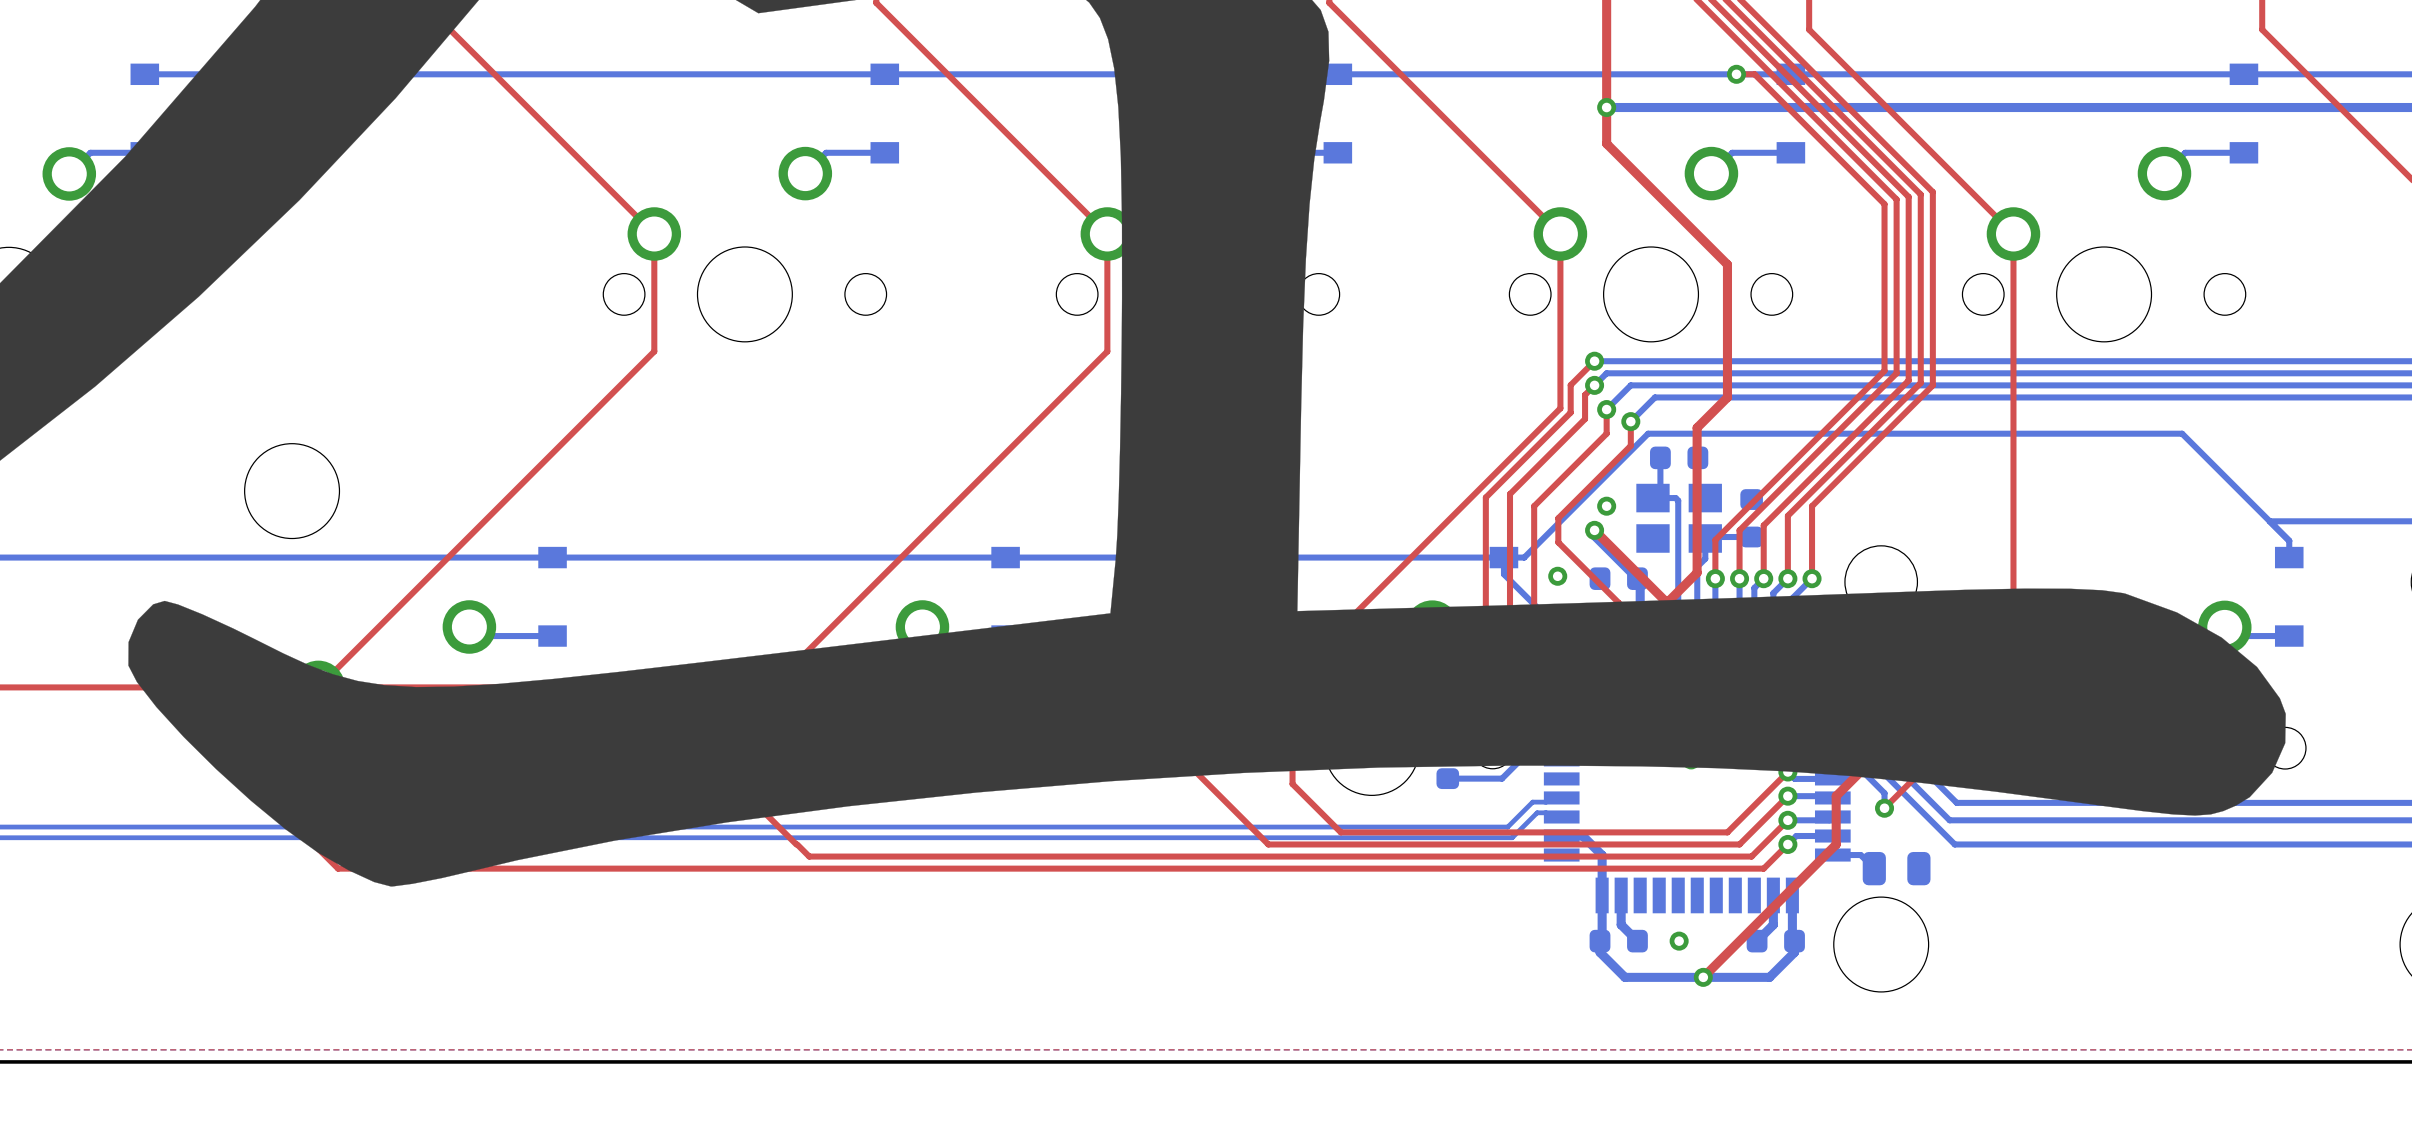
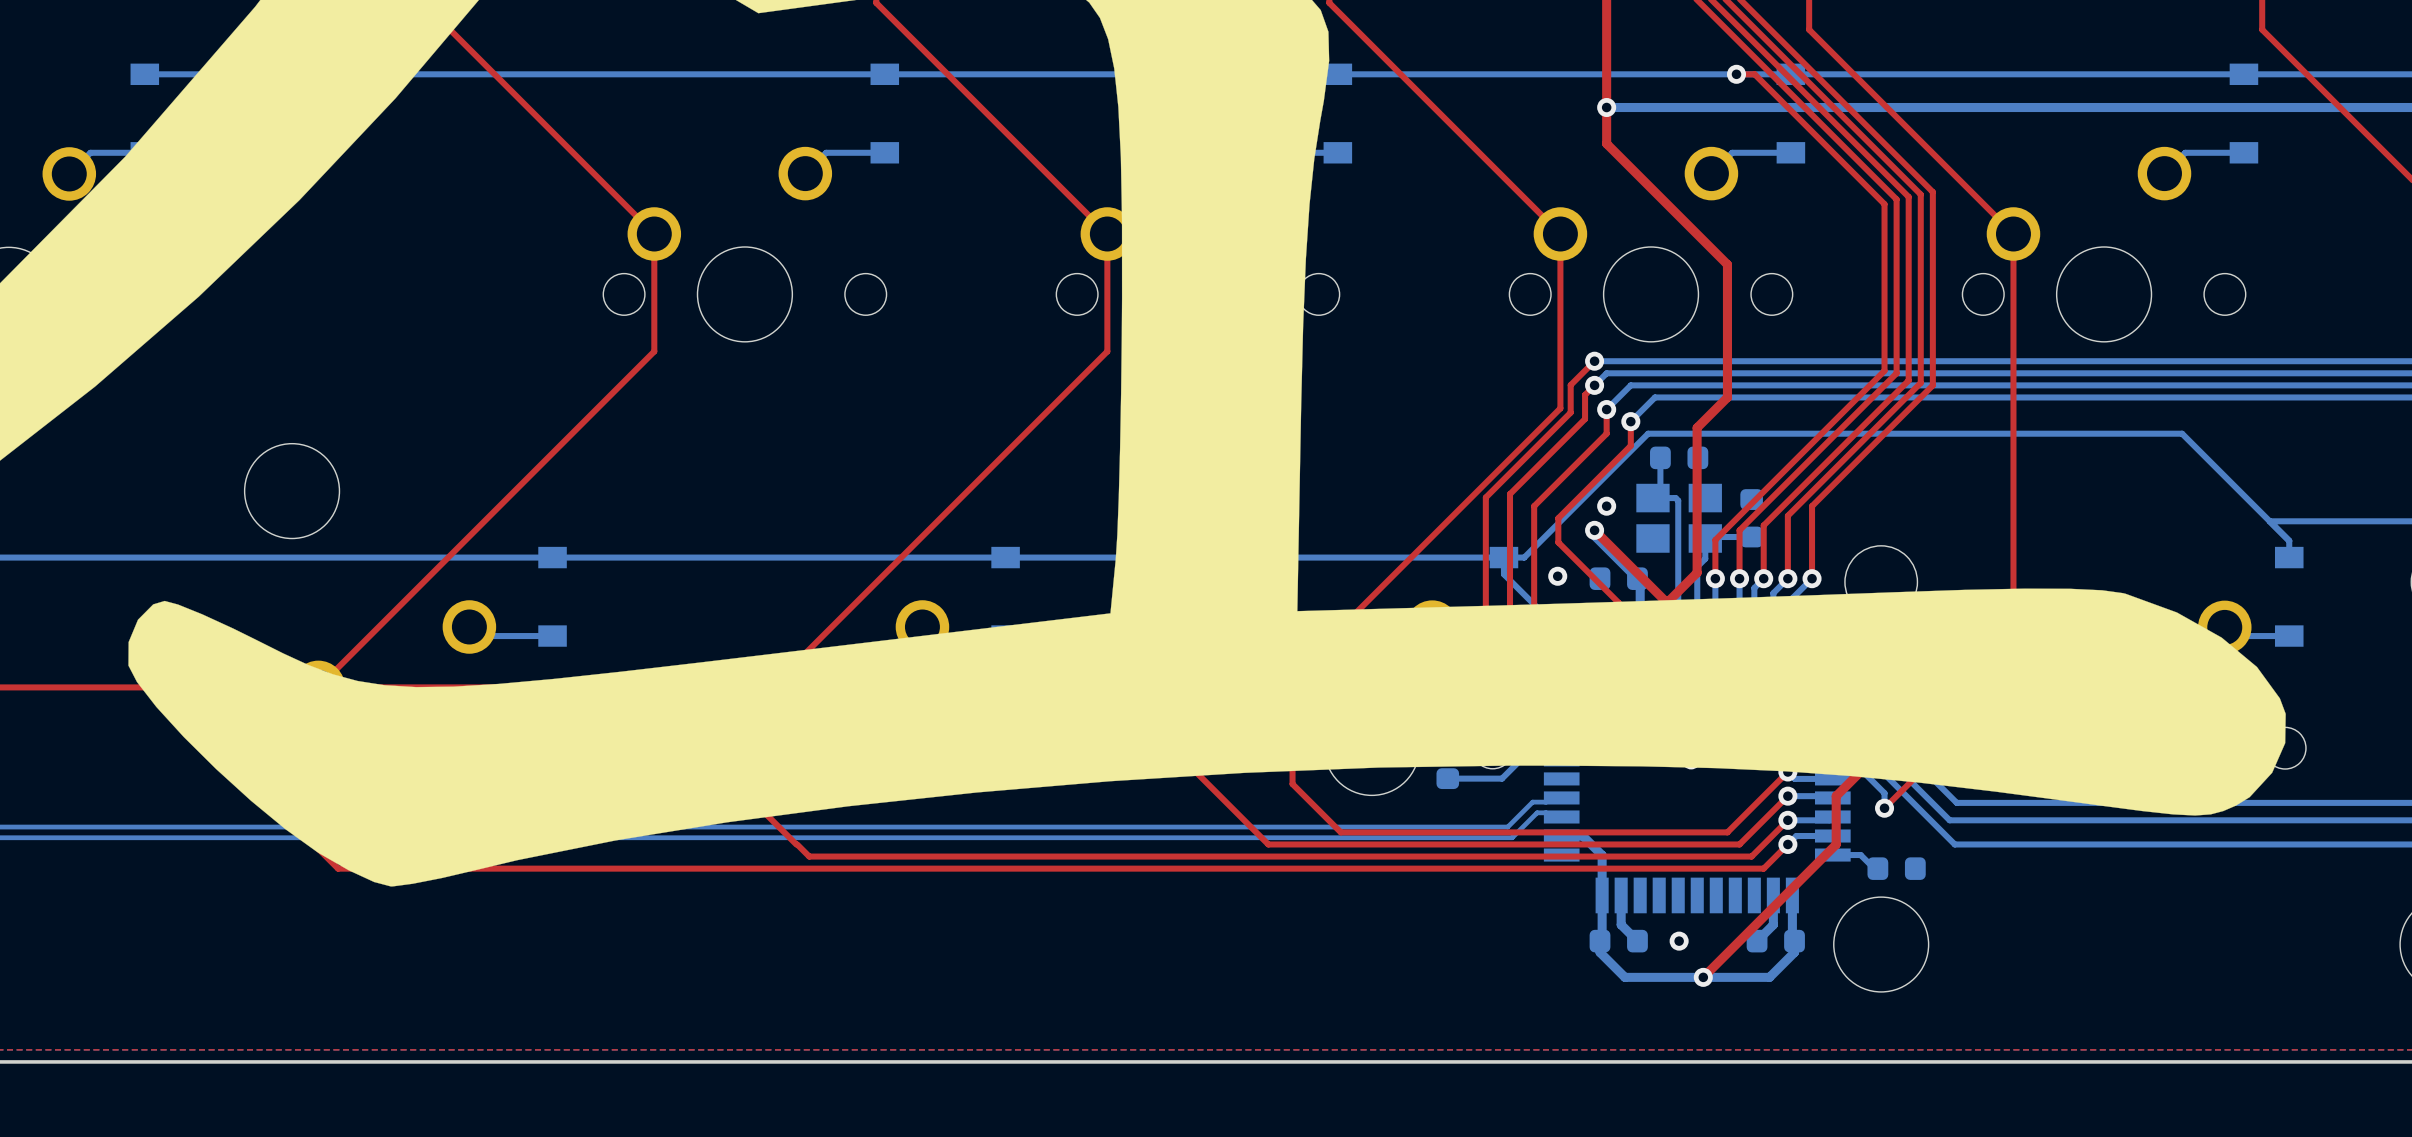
part footprint: [1862, 851, 1931, 886] -> [1867, 857, 1926, 880]

